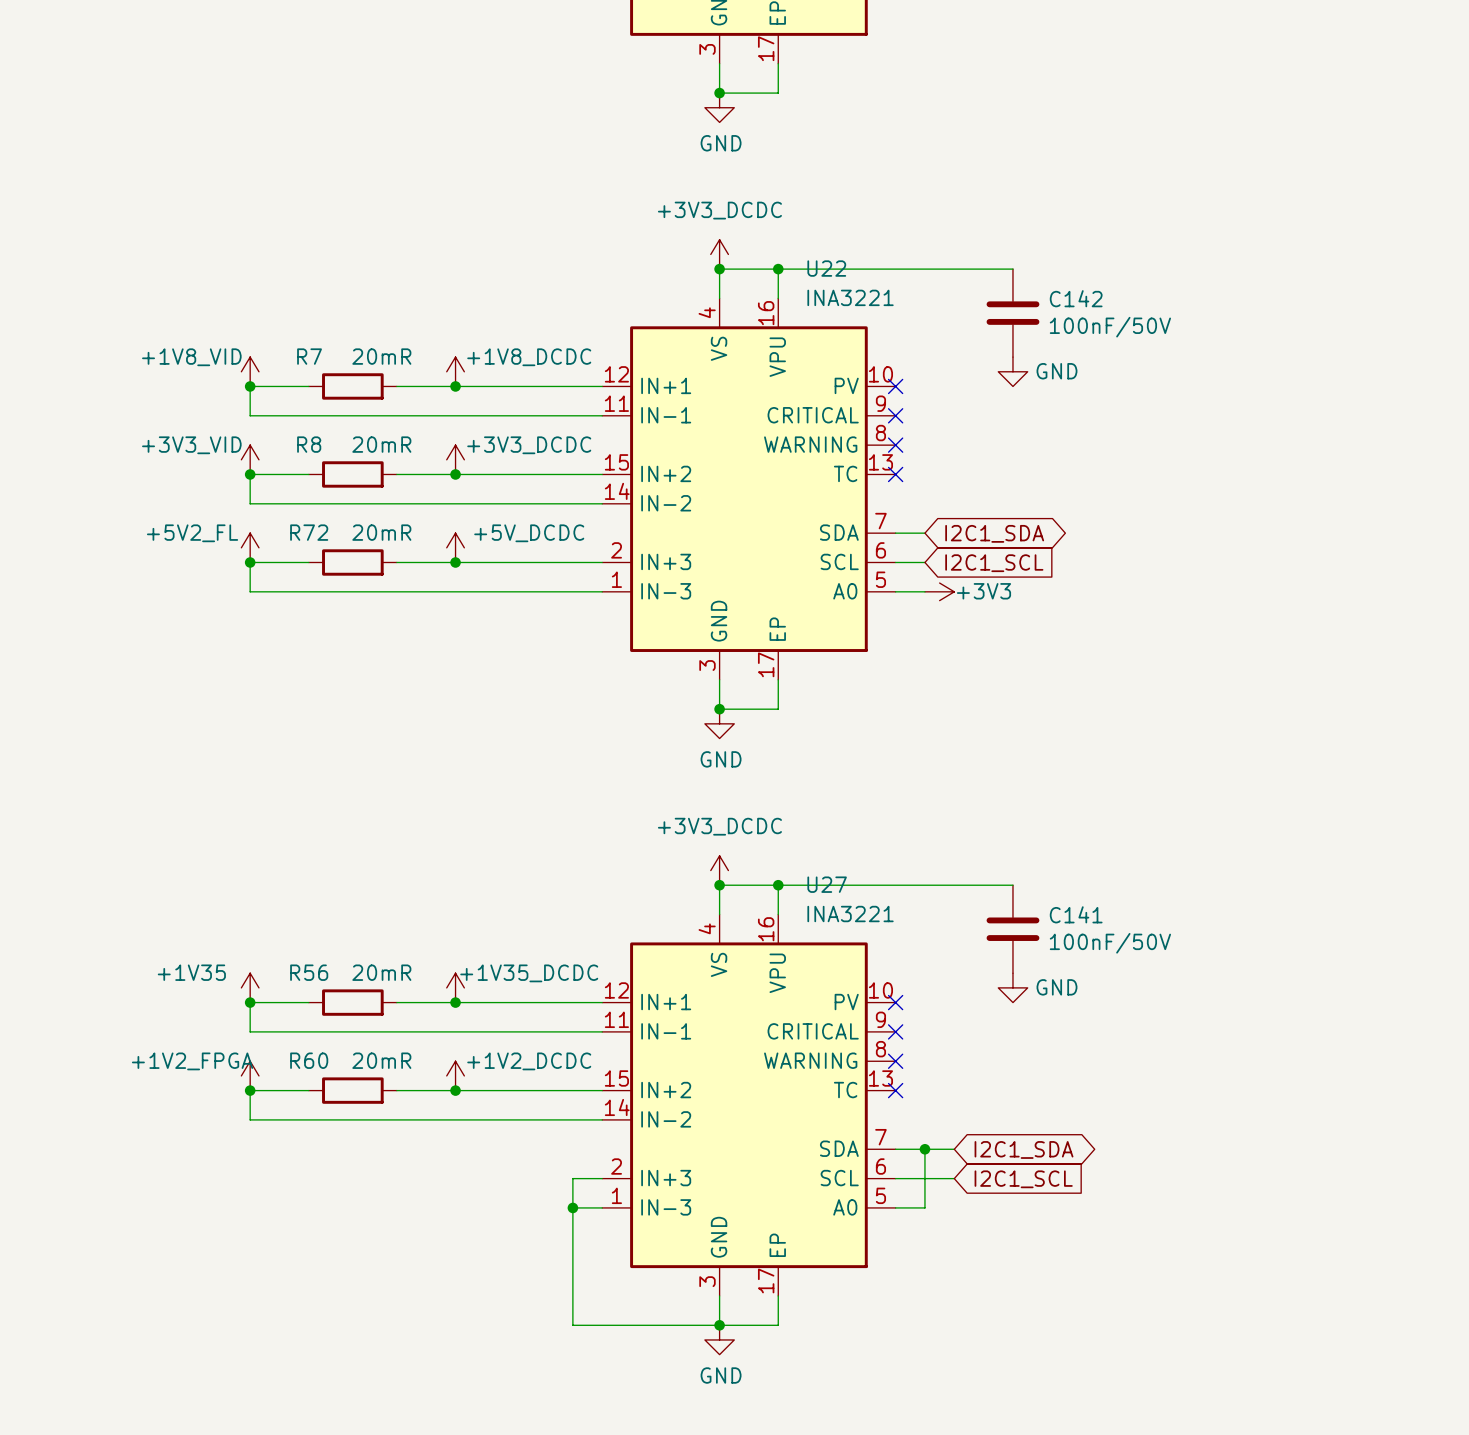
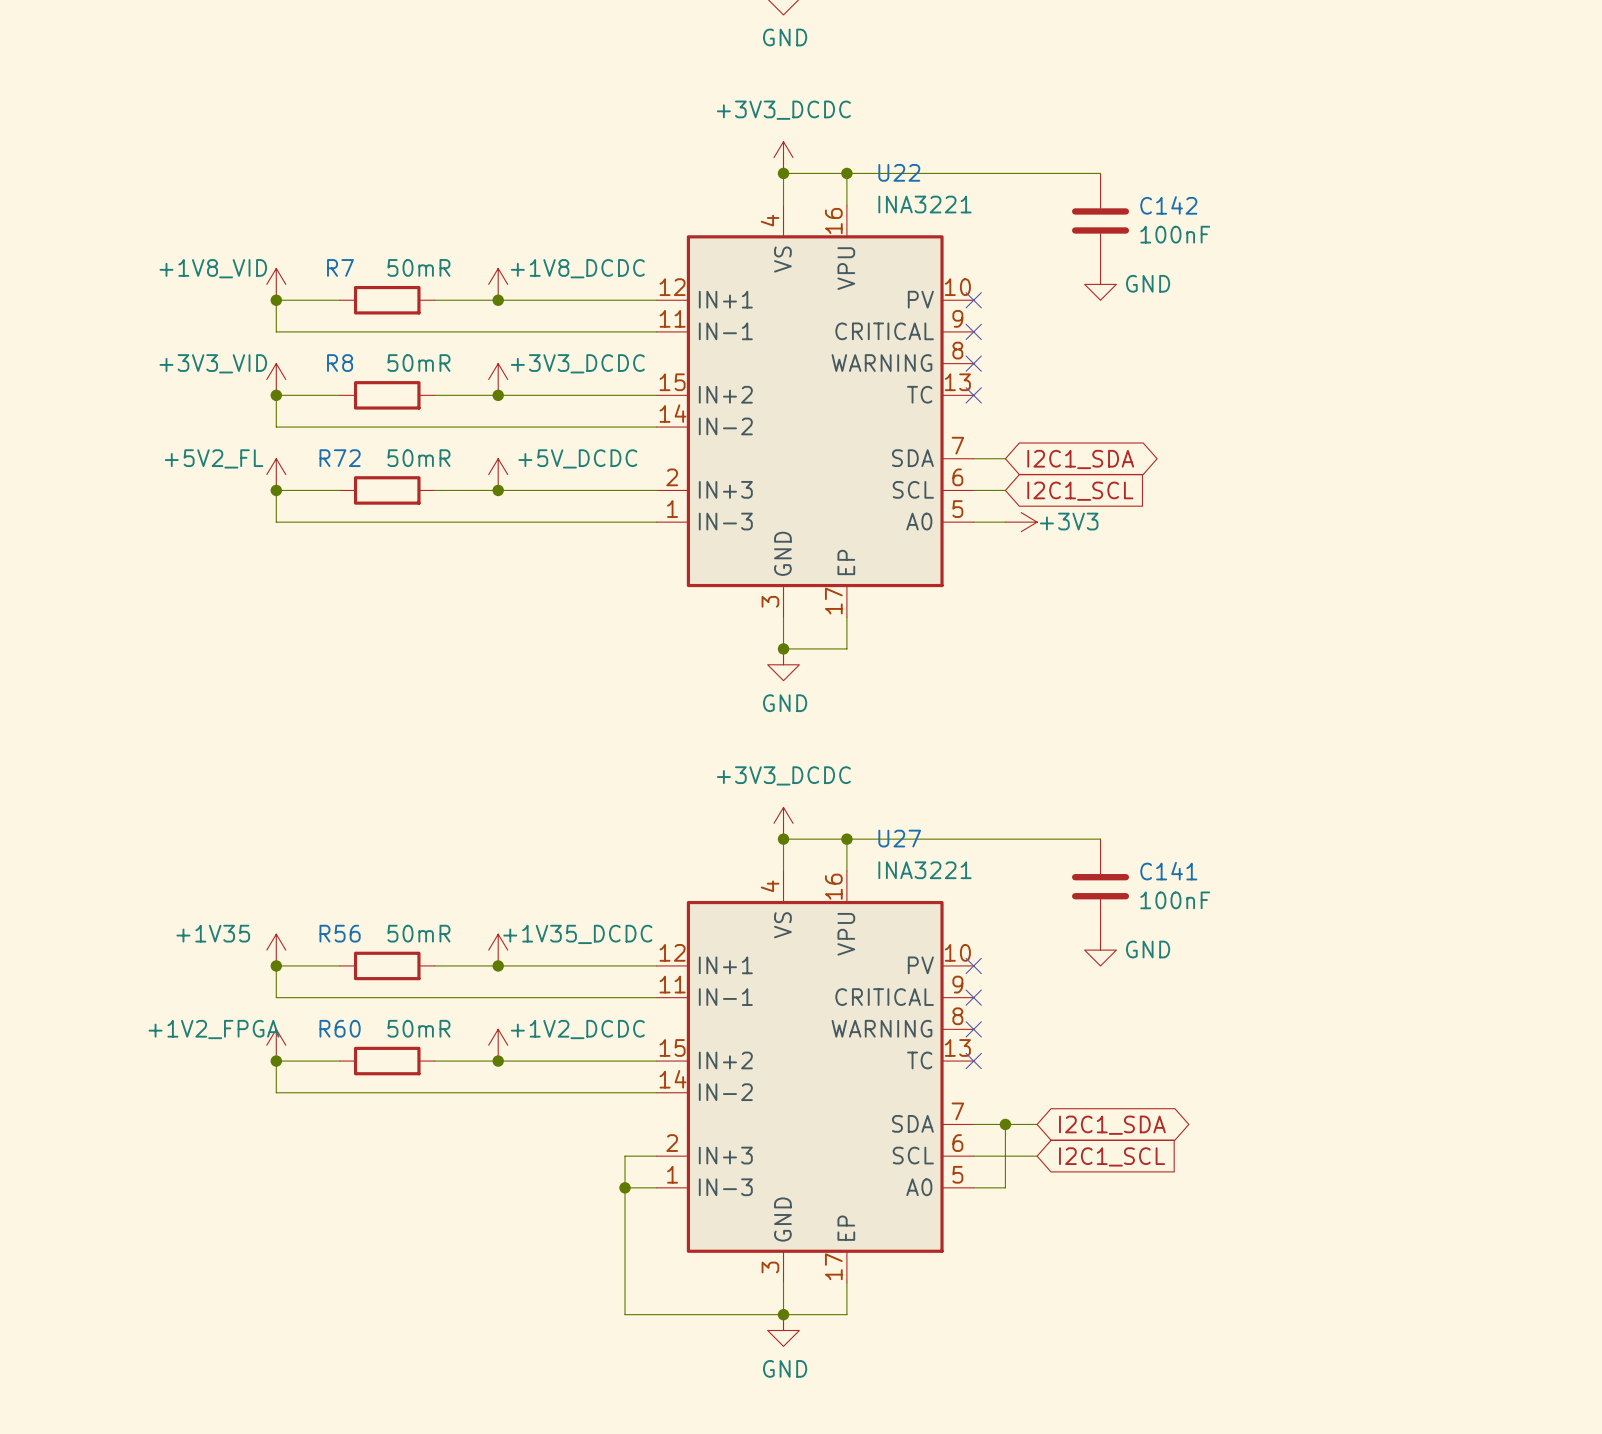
C142 value: 100nF/50V (1110, 327) -> 100nF (1175, 234)
R7 value: 20mR (381, 356) -> 50mR (418, 267)
R8 value: 20mR (381, 444) -> 50mR (418, 363)
R72 value: 20mR (381, 532) -> 50mR (418, 458)
C141 value: 100nF/50V (1110, 943) -> 100nF (1175, 900)
R56 value: 20mR (381, 972) -> 50mR (418, 933)
R60 value: 20mR (381, 1060) -> 50mR (418, 1028)

